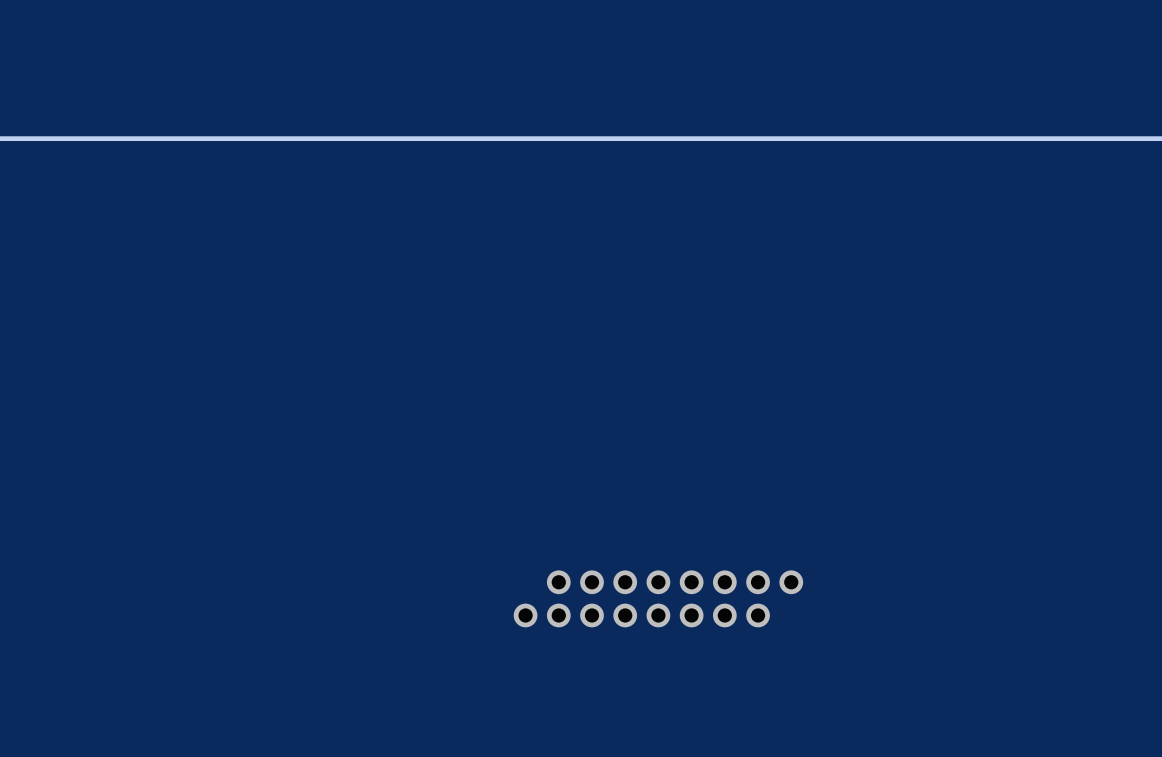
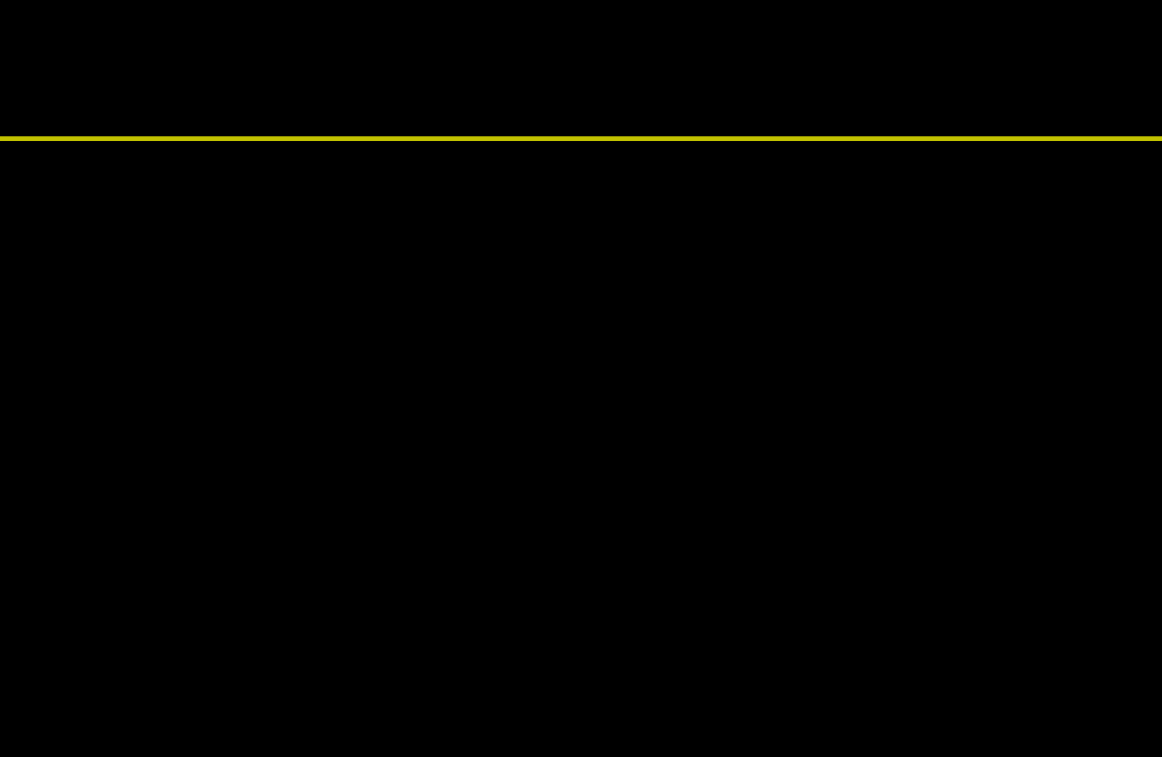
via: (558, 582) -> none
via: (592, 582) -> none
via: (625, 582) -> none
via: (658, 582) -> none
via: (691, 582) -> none
via: (724, 582) -> none
via: (758, 582) -> none
via: (791, 582) -> none
via: (525, 615) -> none
via: (558, 615) -> none
via: (592, 615) -> none
via: (625, 615) -> none
via: (658, 615) -> none
via: (691, 615) -> none
via: (724, 615) -> none
via: (758, 615) -> none

